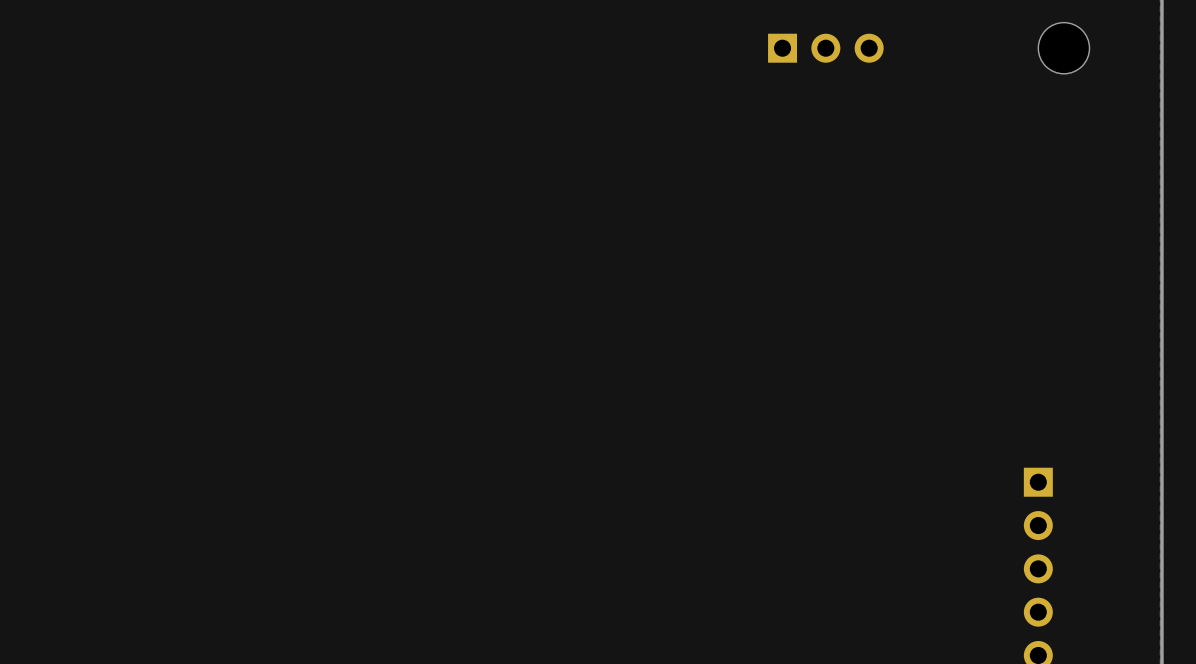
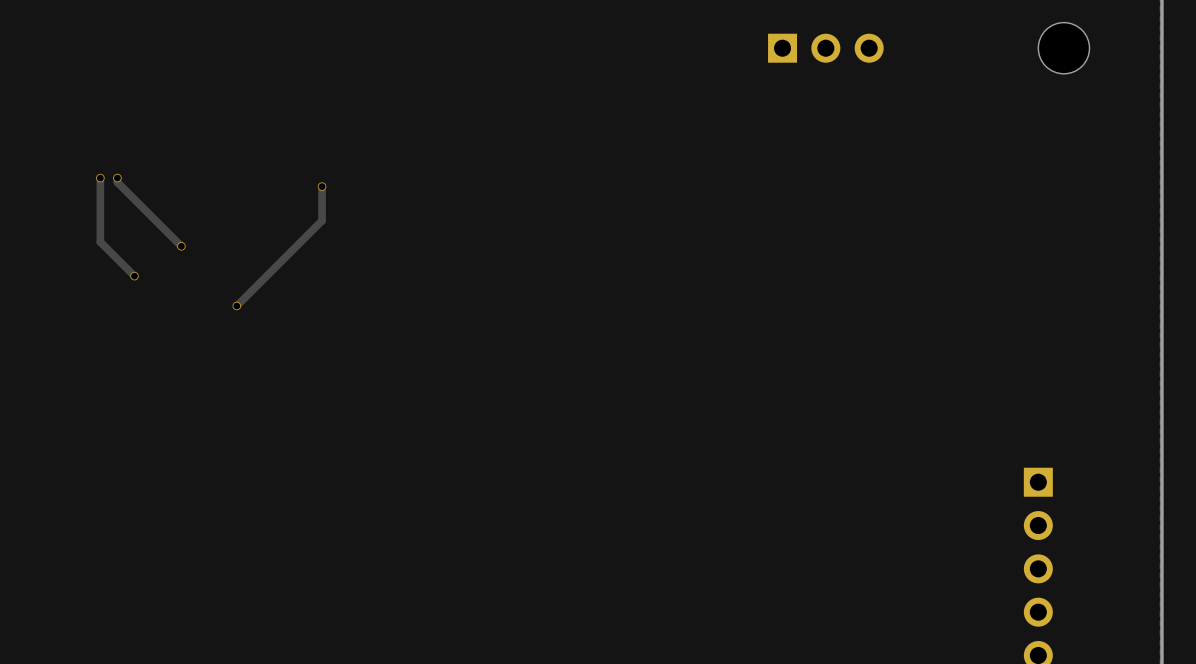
track: none -> (100, 178) (100, 242) (134, 276)
via: none -> (100, 178)
track: none -> (117, 178) (117, 182) (181, 246)
via: none -> (117, 178)
track: none -> (322, 186) (322, 220) (236, 305)
via: none -> (322, 186)
via: none -> (181, 246)
via: none -> (134, 276)
via: none -> (236, 305)

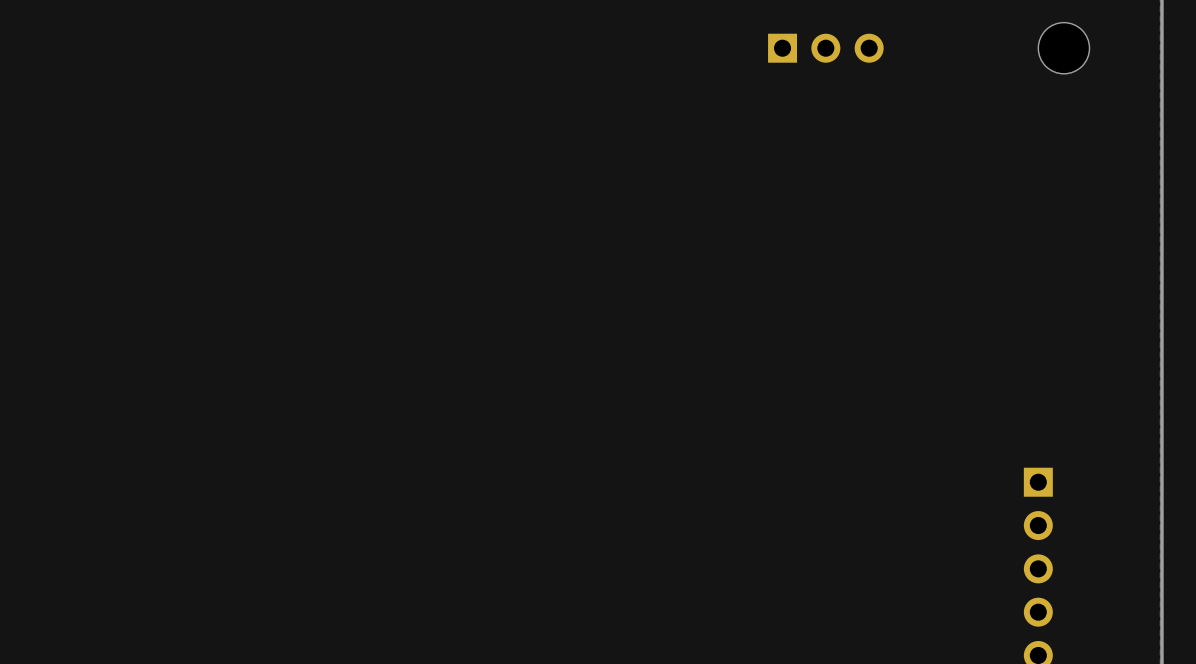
track: (100, 178) (100, 242) (134, 276) -> none
via: (100, 178) -> none
track: (117, 178) (117, 182) (181, 246) -> none
via: (117, 178) -> none
track: (322, 186) (322, 220) (236, 305) -> none
via: (322, 186) -> none
via: (181, 246) -> none
via: (134, 276) -> none
via: (236, 305) -> none

